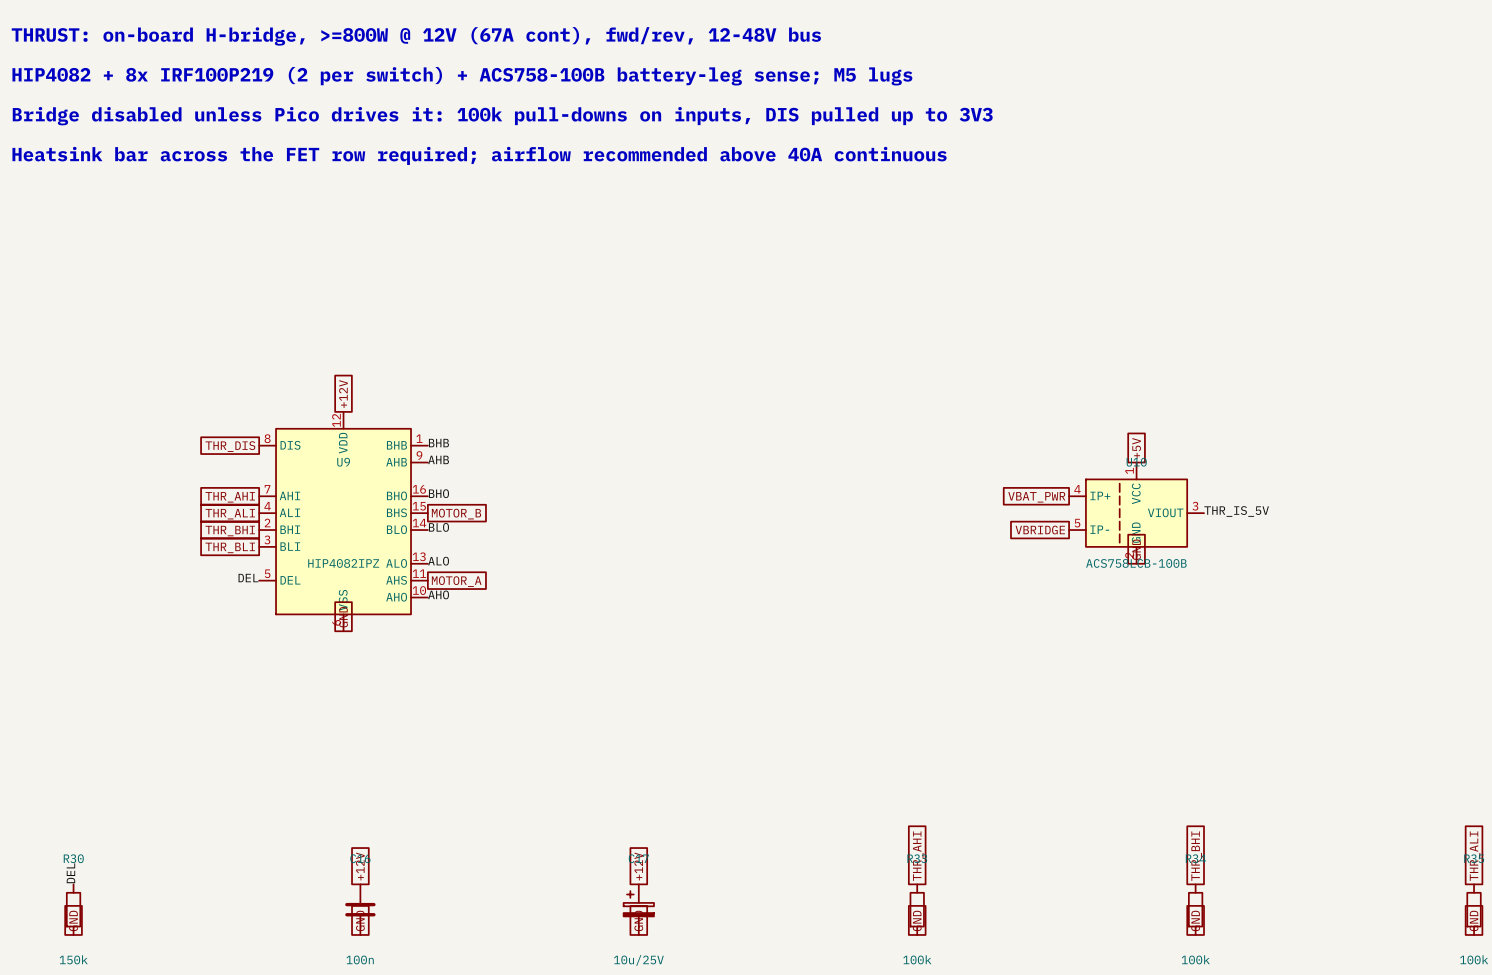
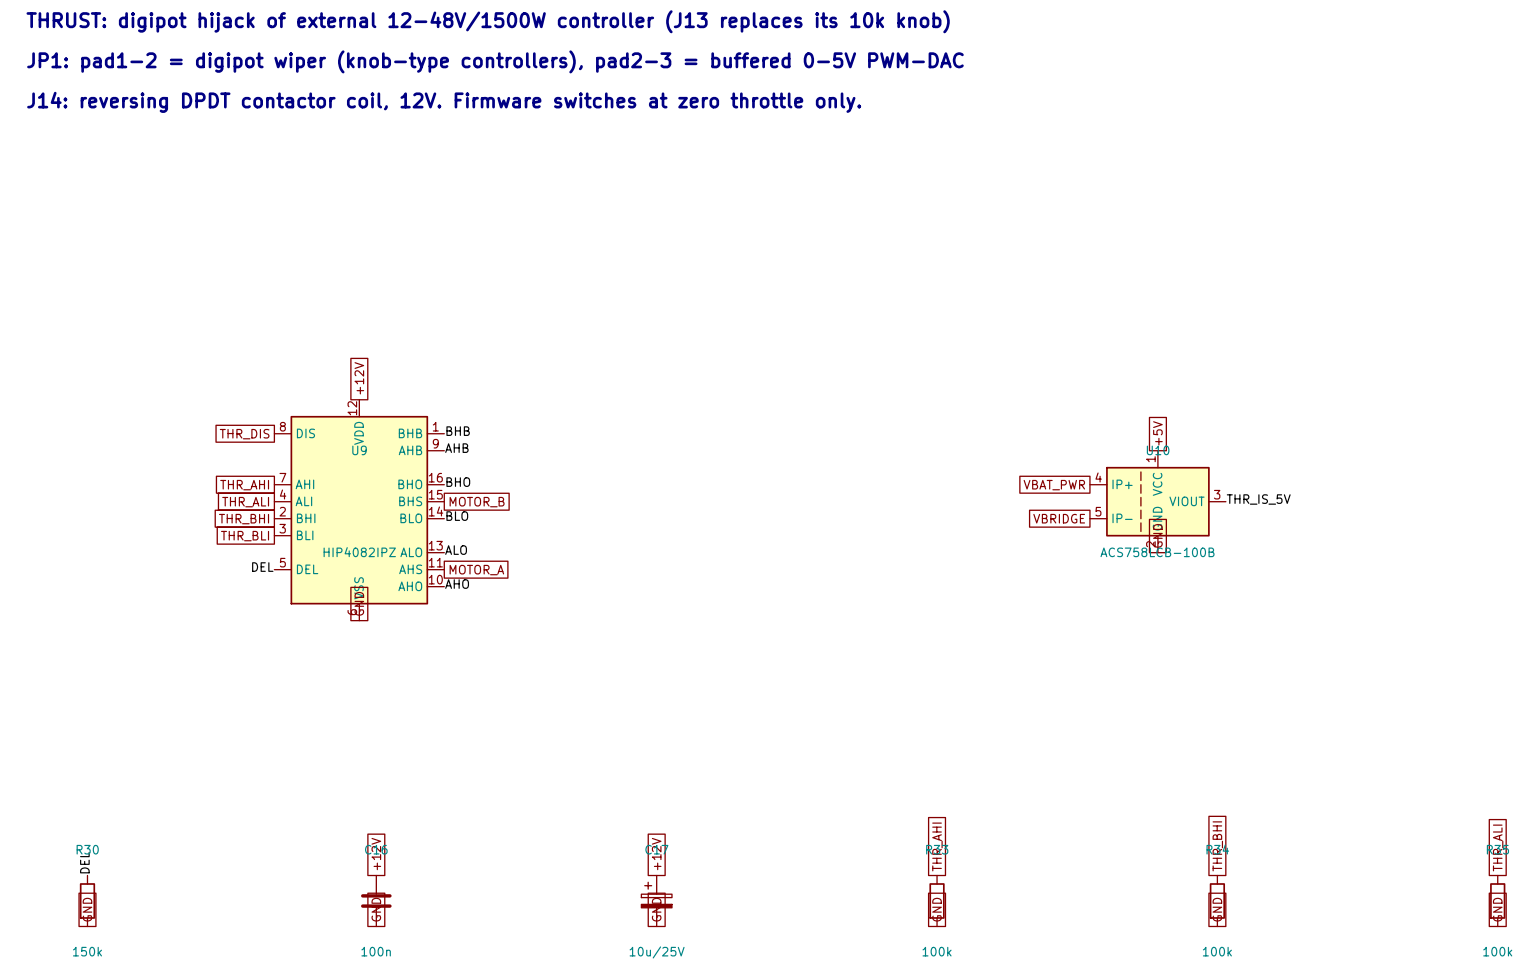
text: THRUST: on-board H-bridge, >=800W @ 12V (67A cont), fwd/rev, 12-48V bus (416, 36) -> THRUST: digipot hijack of external 12-48V/1500W controller (J13 replaces its 10k knob) (488, 21)
text: HIP4082 + 8x IRF100P219 (2 per switch) + ACS758-100B battery-leg sense; M5 lugs (462, 76) -> JP1: pad1-2 = digipot wiper (knob-type controllers), pad2-3 = buffered 0-5V PWM-DAC (495, 61)
text: Bridge disabled unless Pico drives it: 100k pull-downs on inputs, DIS pulled up to 3V3 (502, 116) -> J14: reversing DPDT contactor coil, 12V. Firmware switches at zero throttle only. (444, 102)
text: Heatsink bar across the FET row required; airflow recommended above 40A continuous (479, 155) -> none

